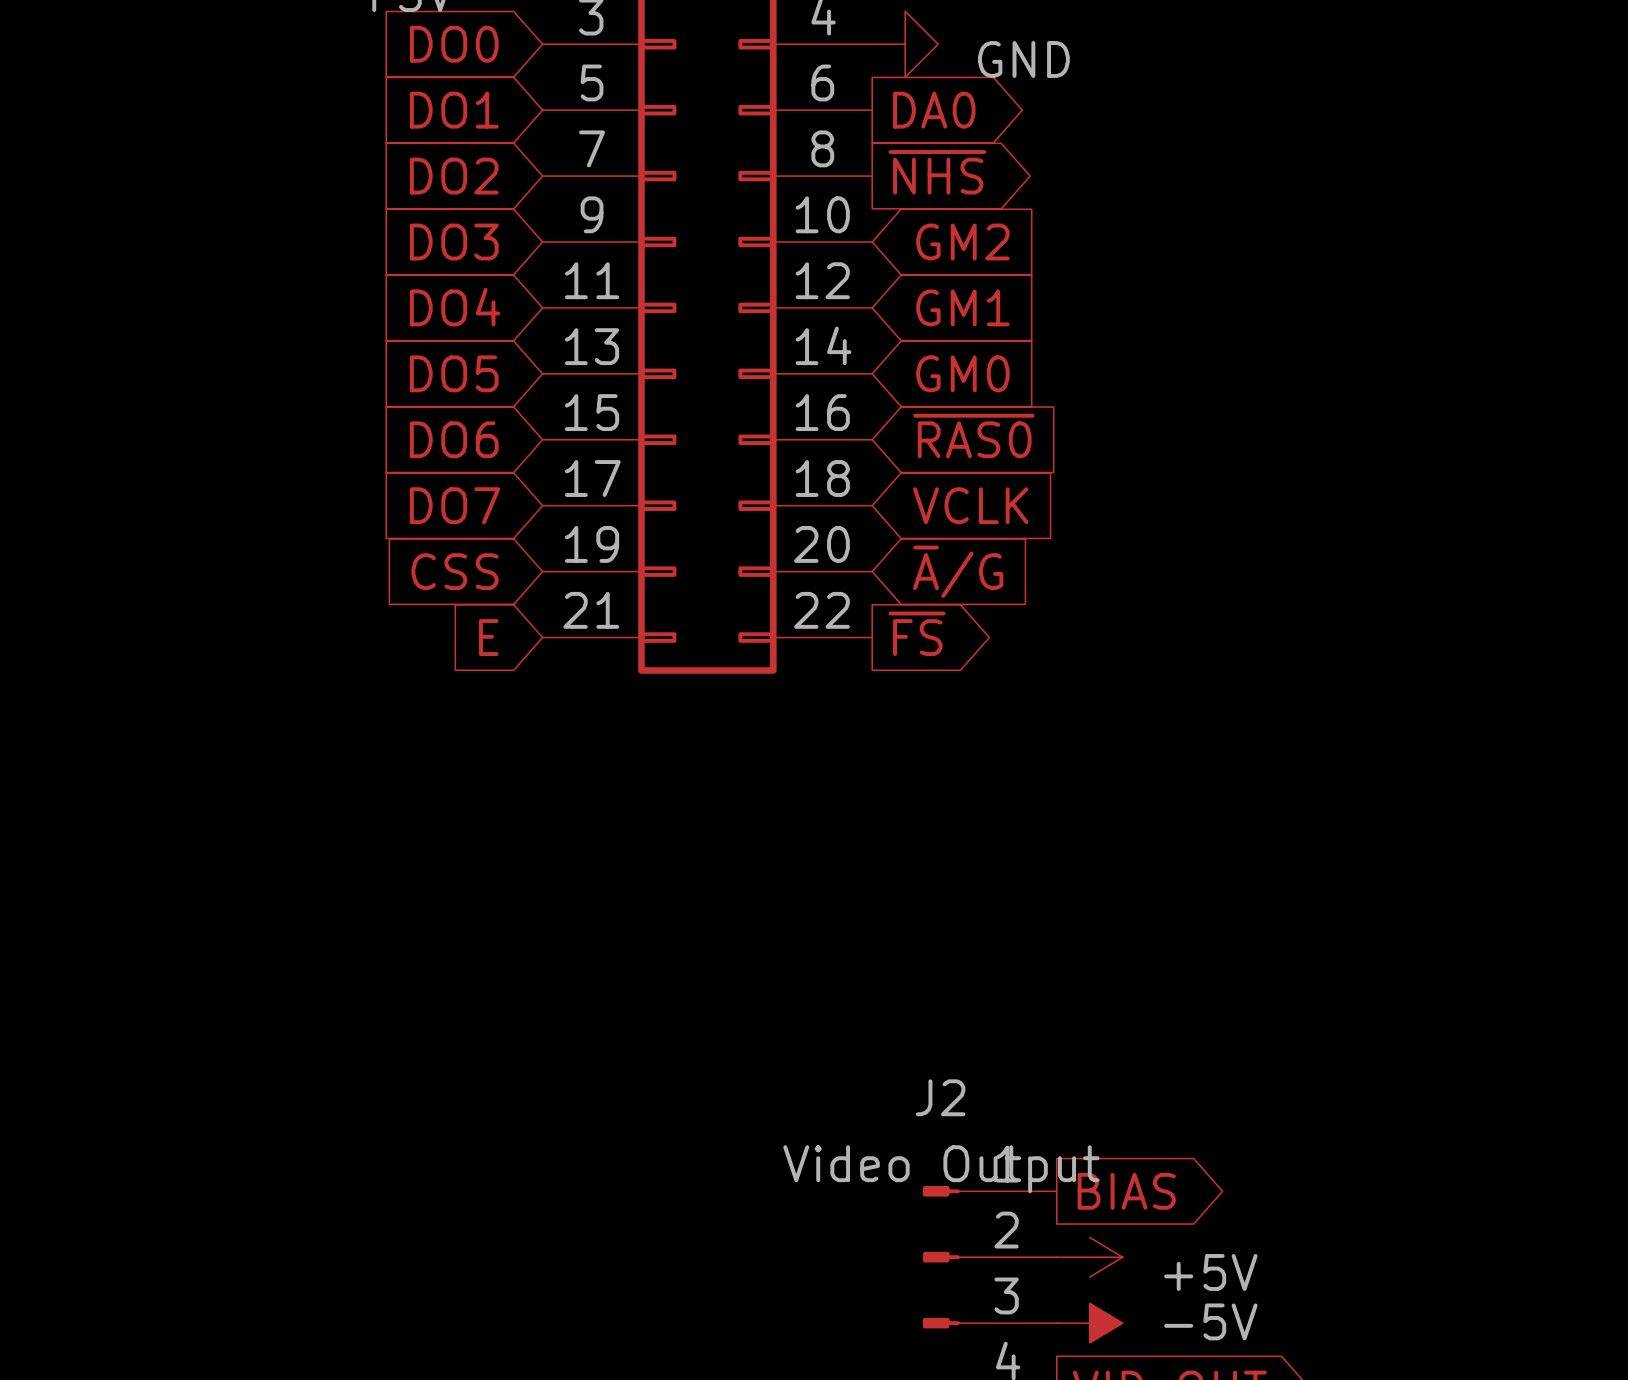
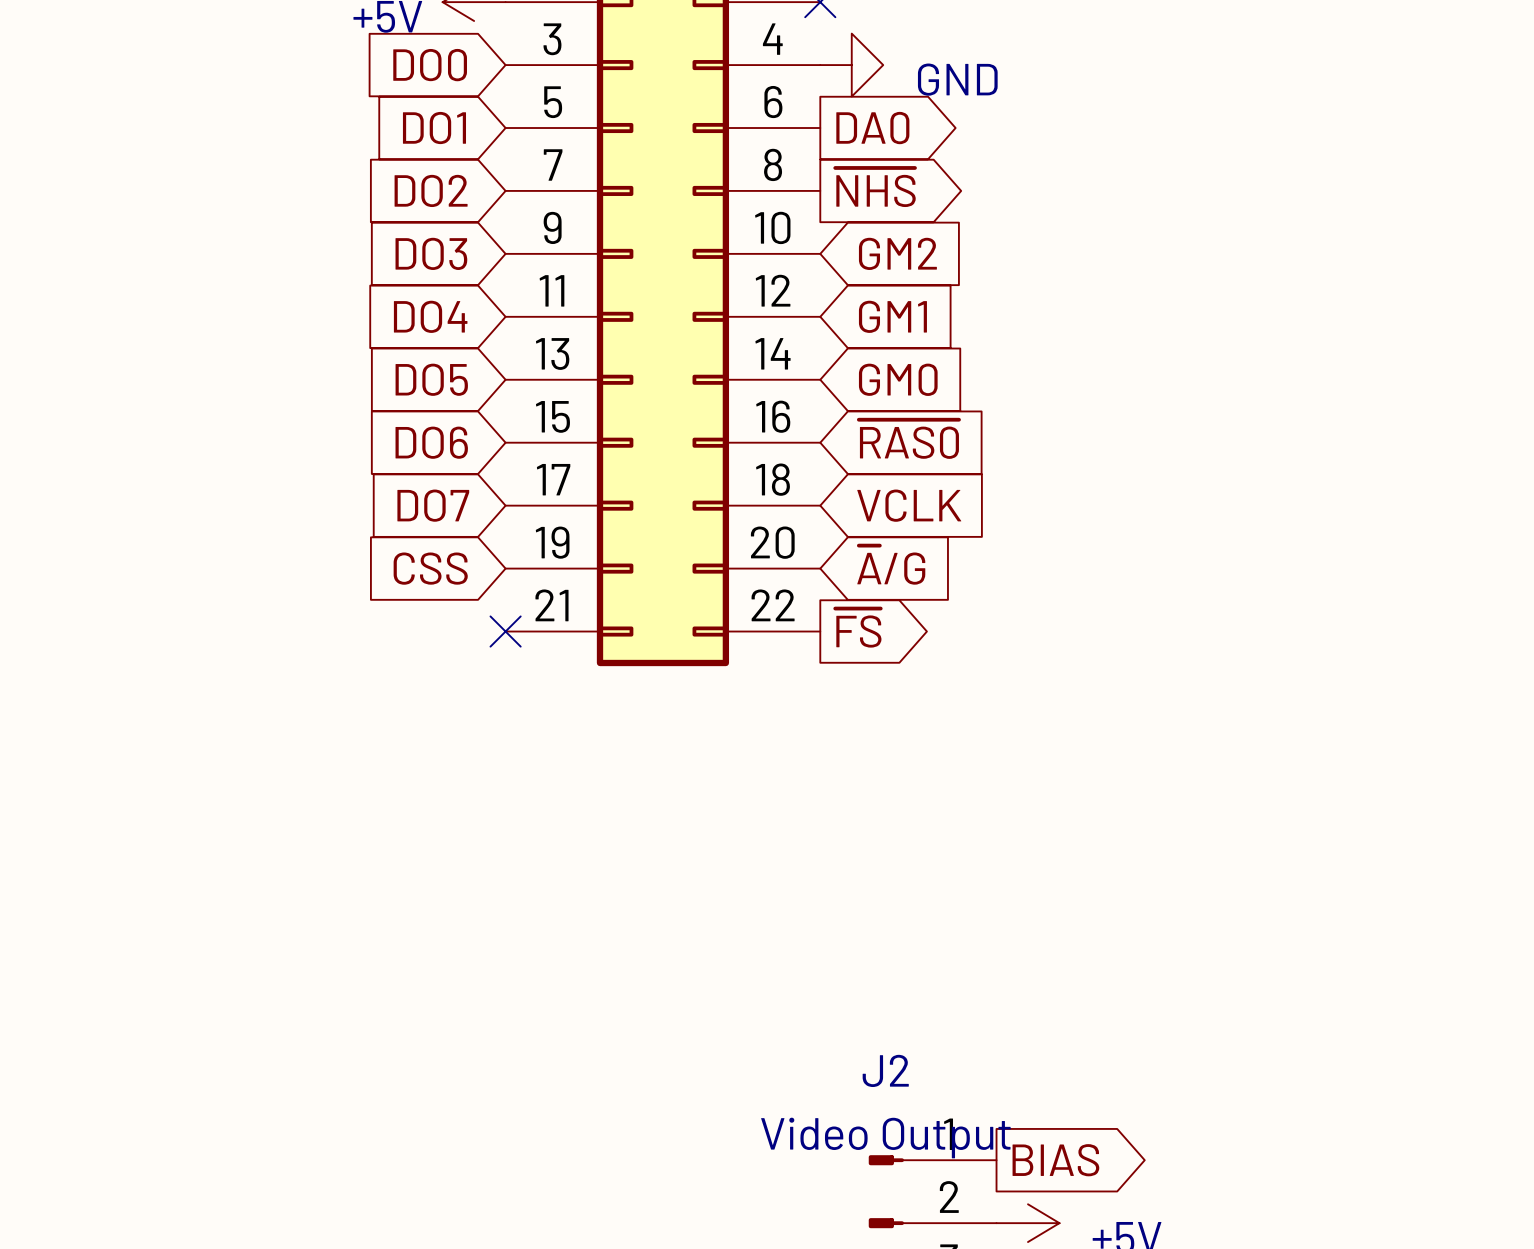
global label: E (488, 637) -> none
no-connect mark: none -> (505, 631)

